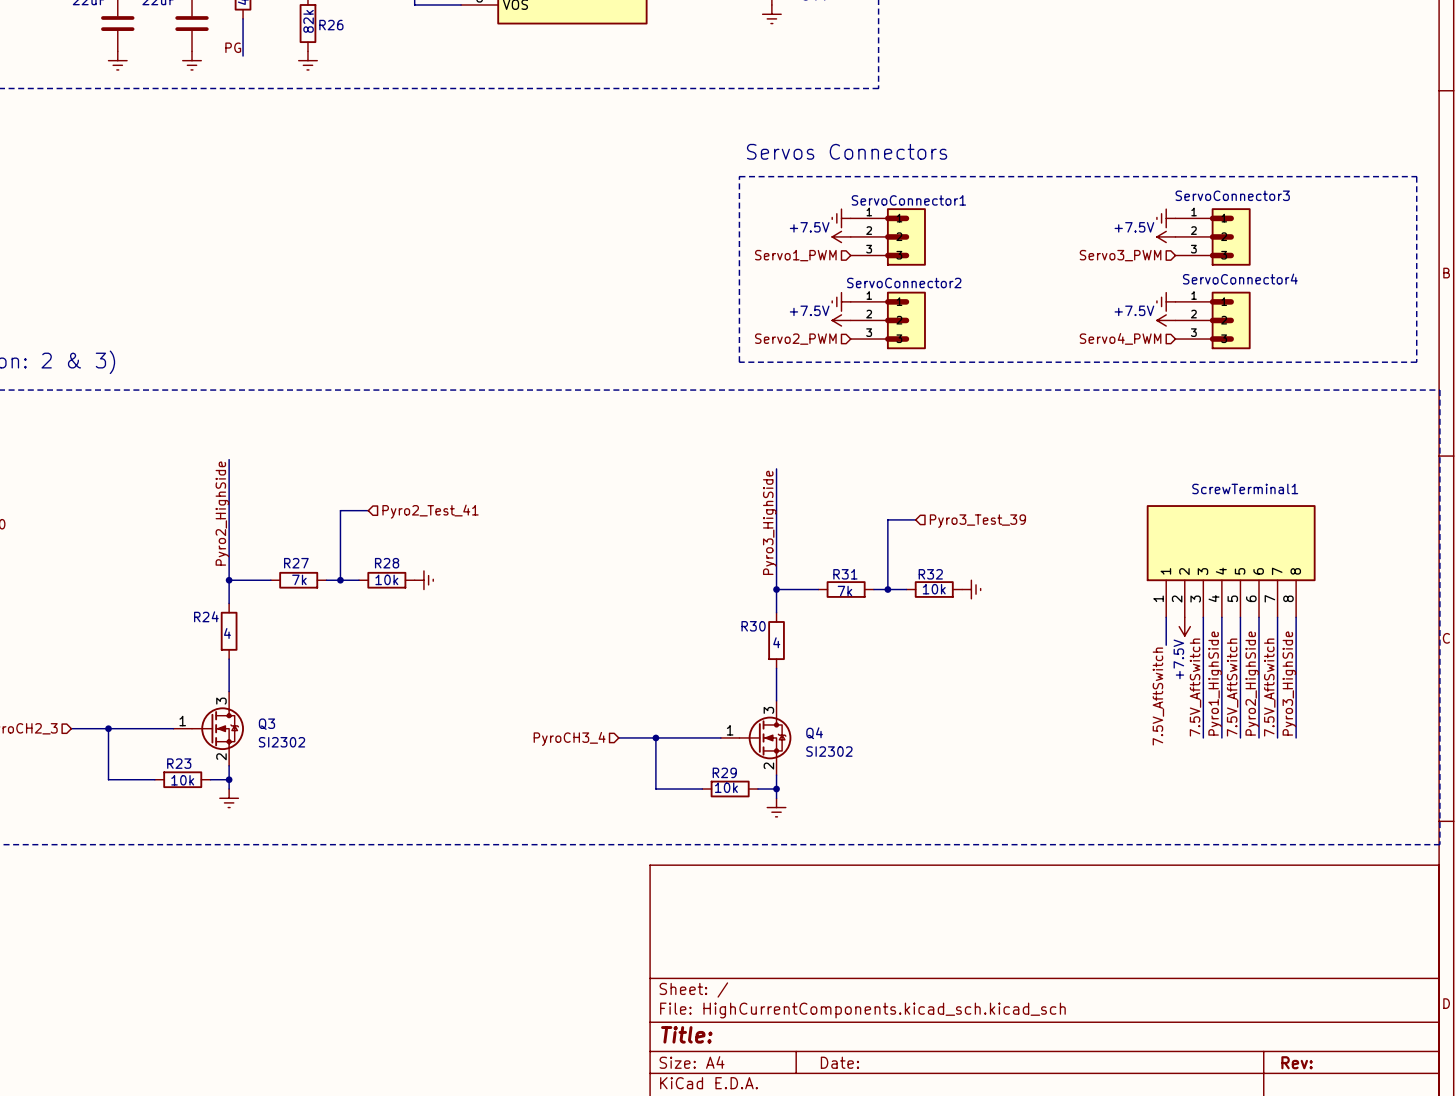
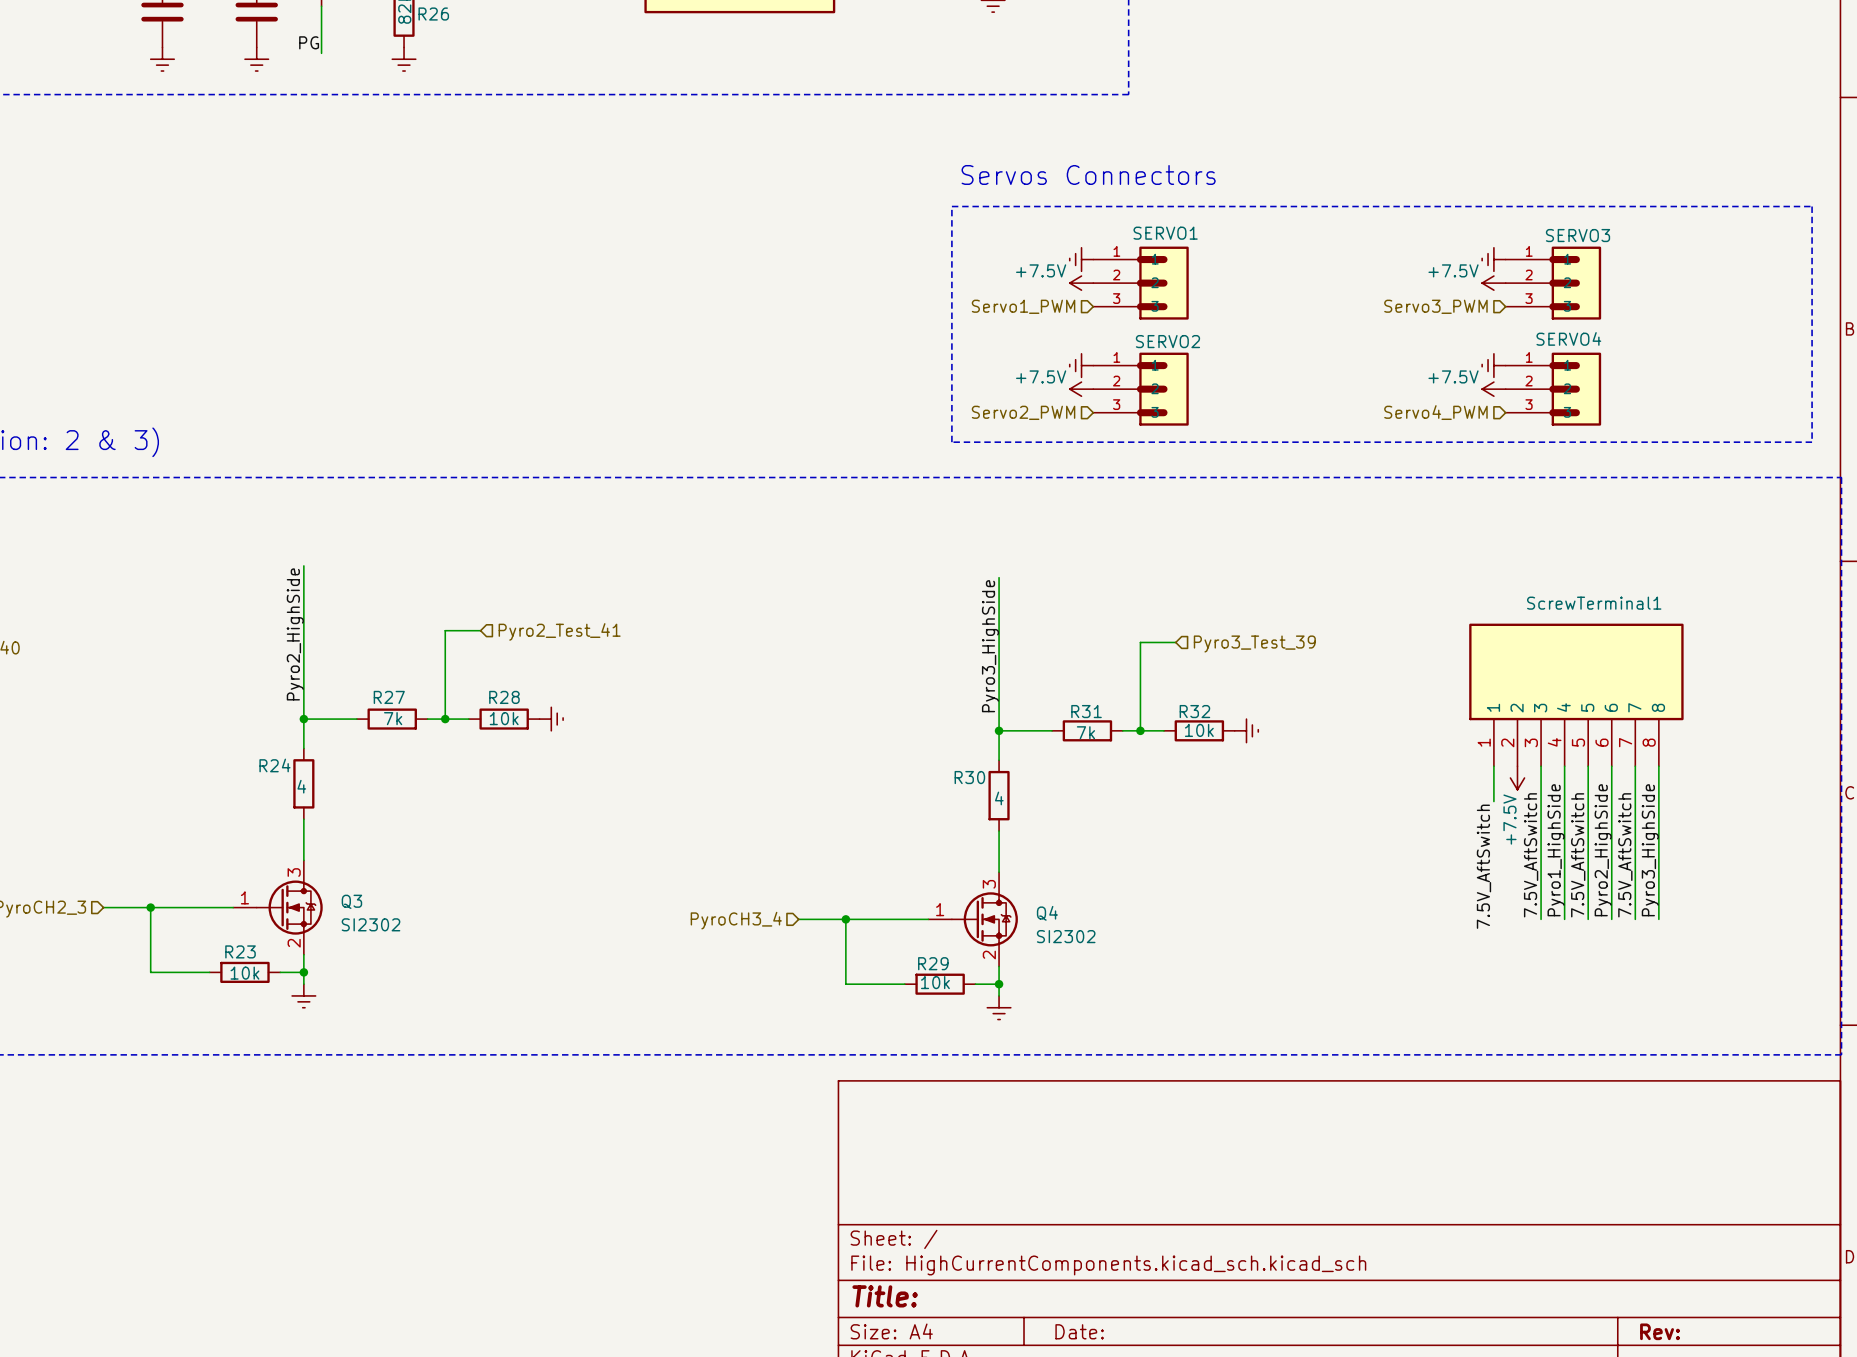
ServoConnector3 name: ServoConnector3 (1232, 195) -> SERVO3 (1578, 235)
ServoConnector1 name: ServoConnector1 (908, 200) -> SERVO1 (1165, 233)
ServoConnector4 name: ServoConnector4 (1240, 279) -> SERVO4 (1568, 338)
ServoConnector2 name: ServoConnector2 (904, 282) -> SERVO2 (1167, 341)

